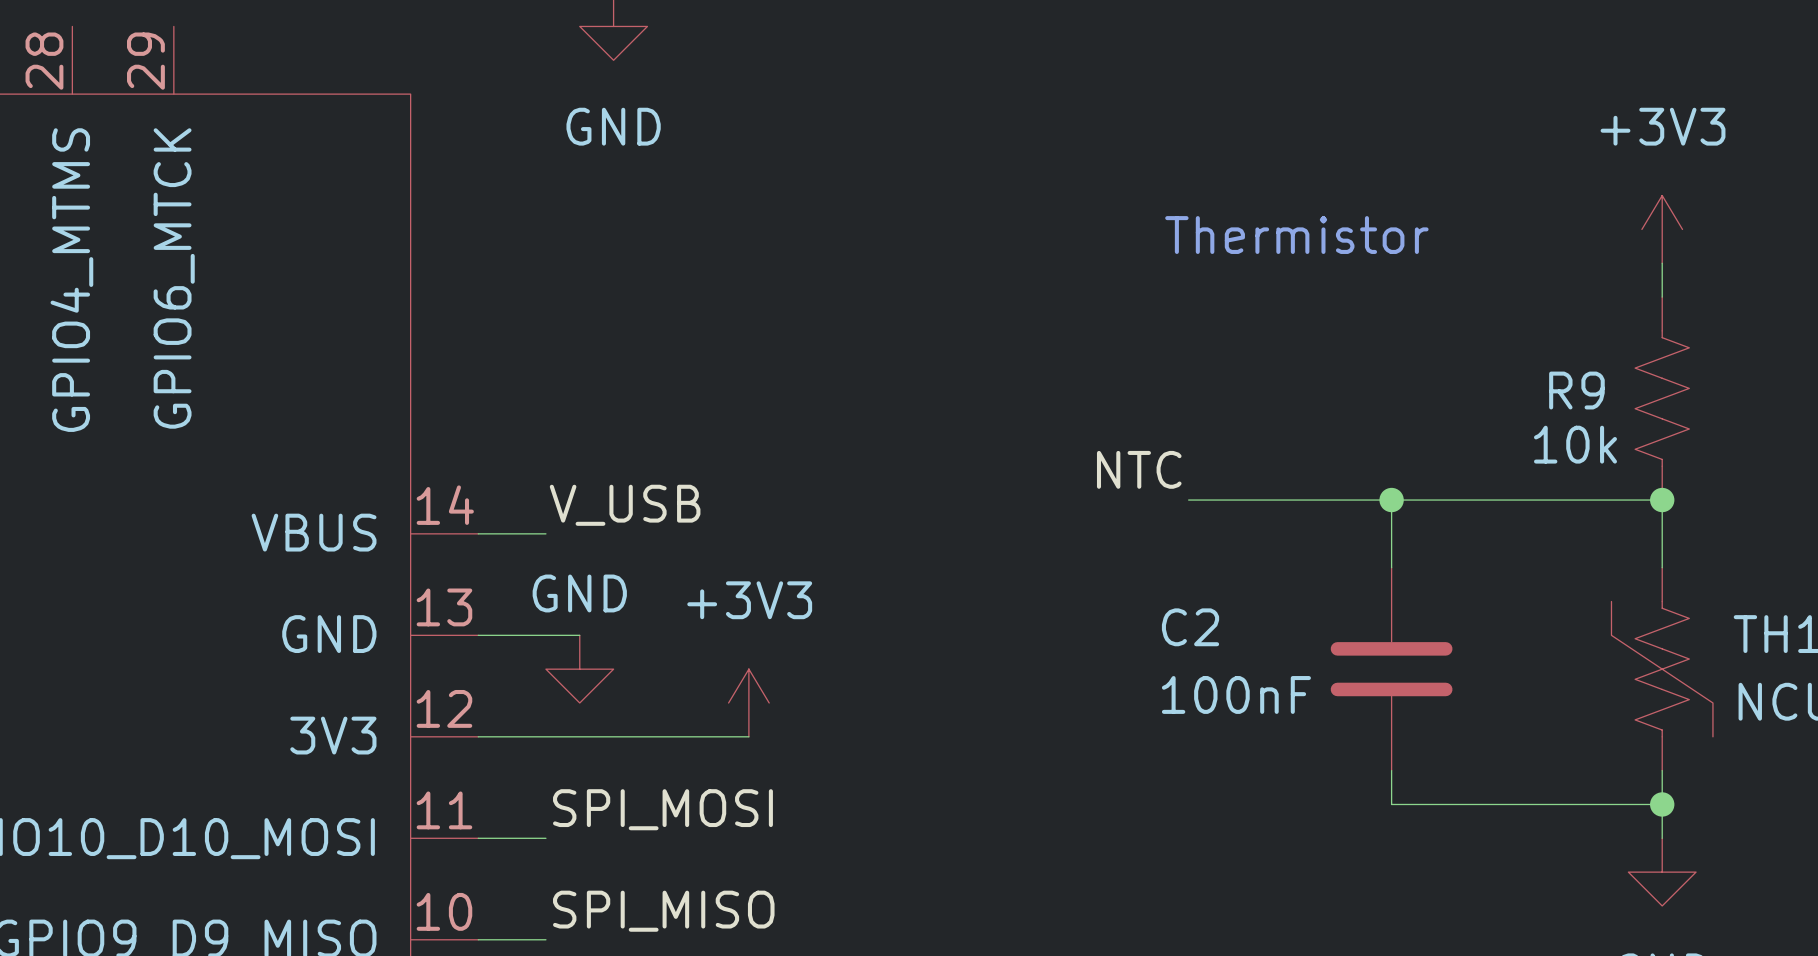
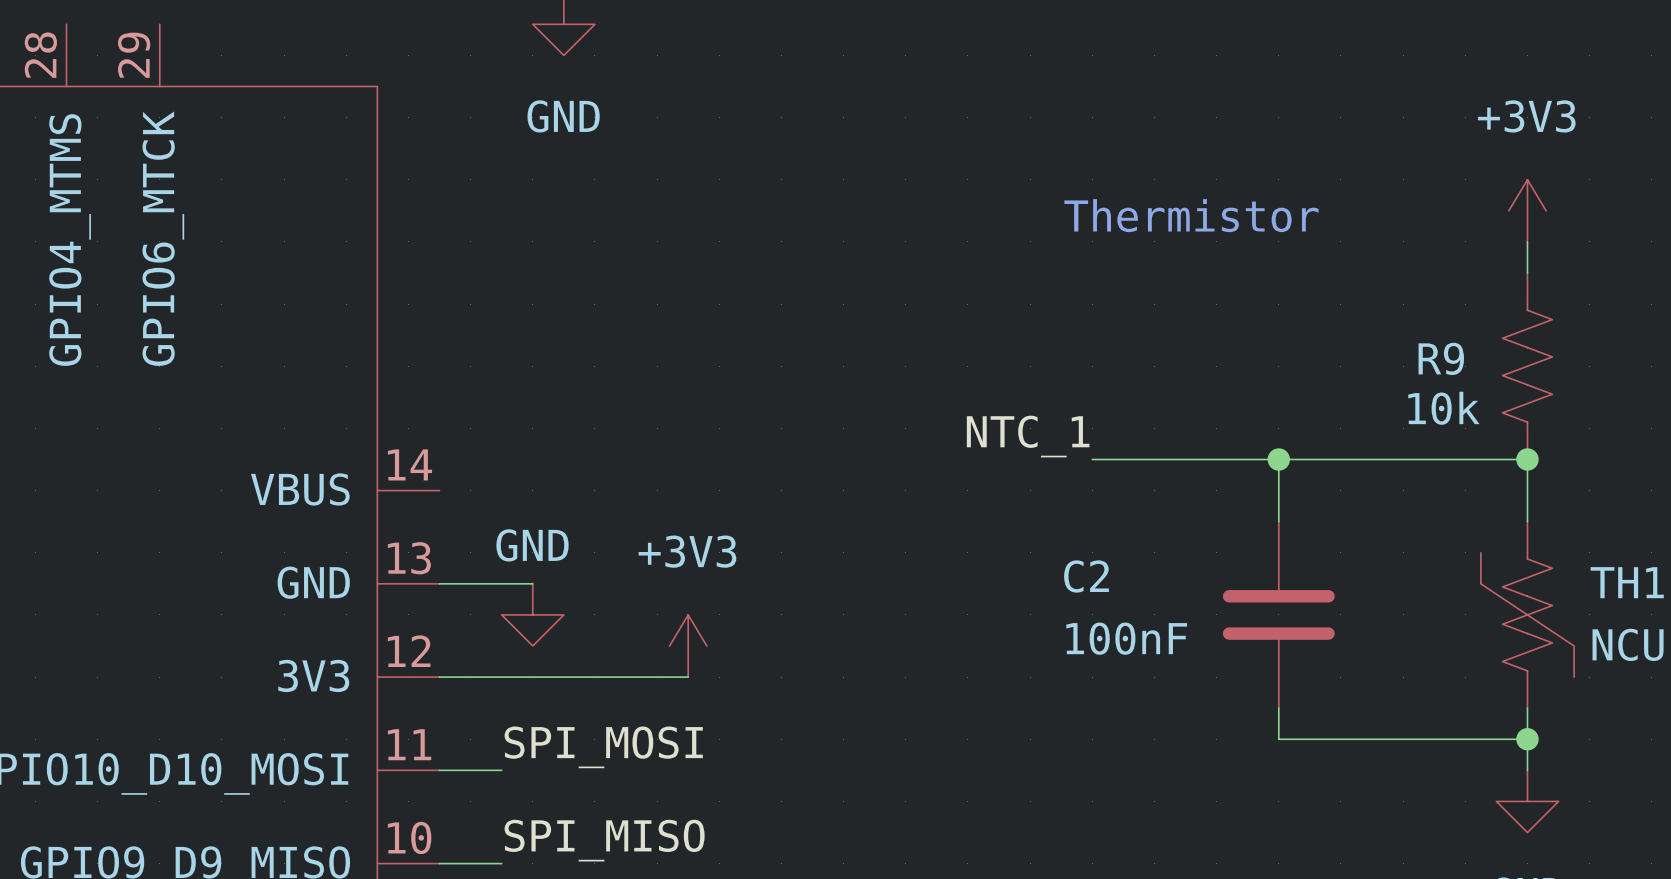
label: NTC (1139, 469) -> NTC_1 (1028, 436)
label: V_USB (625, 505) -> none
wire: (478, 533) (545, 533) -> none

